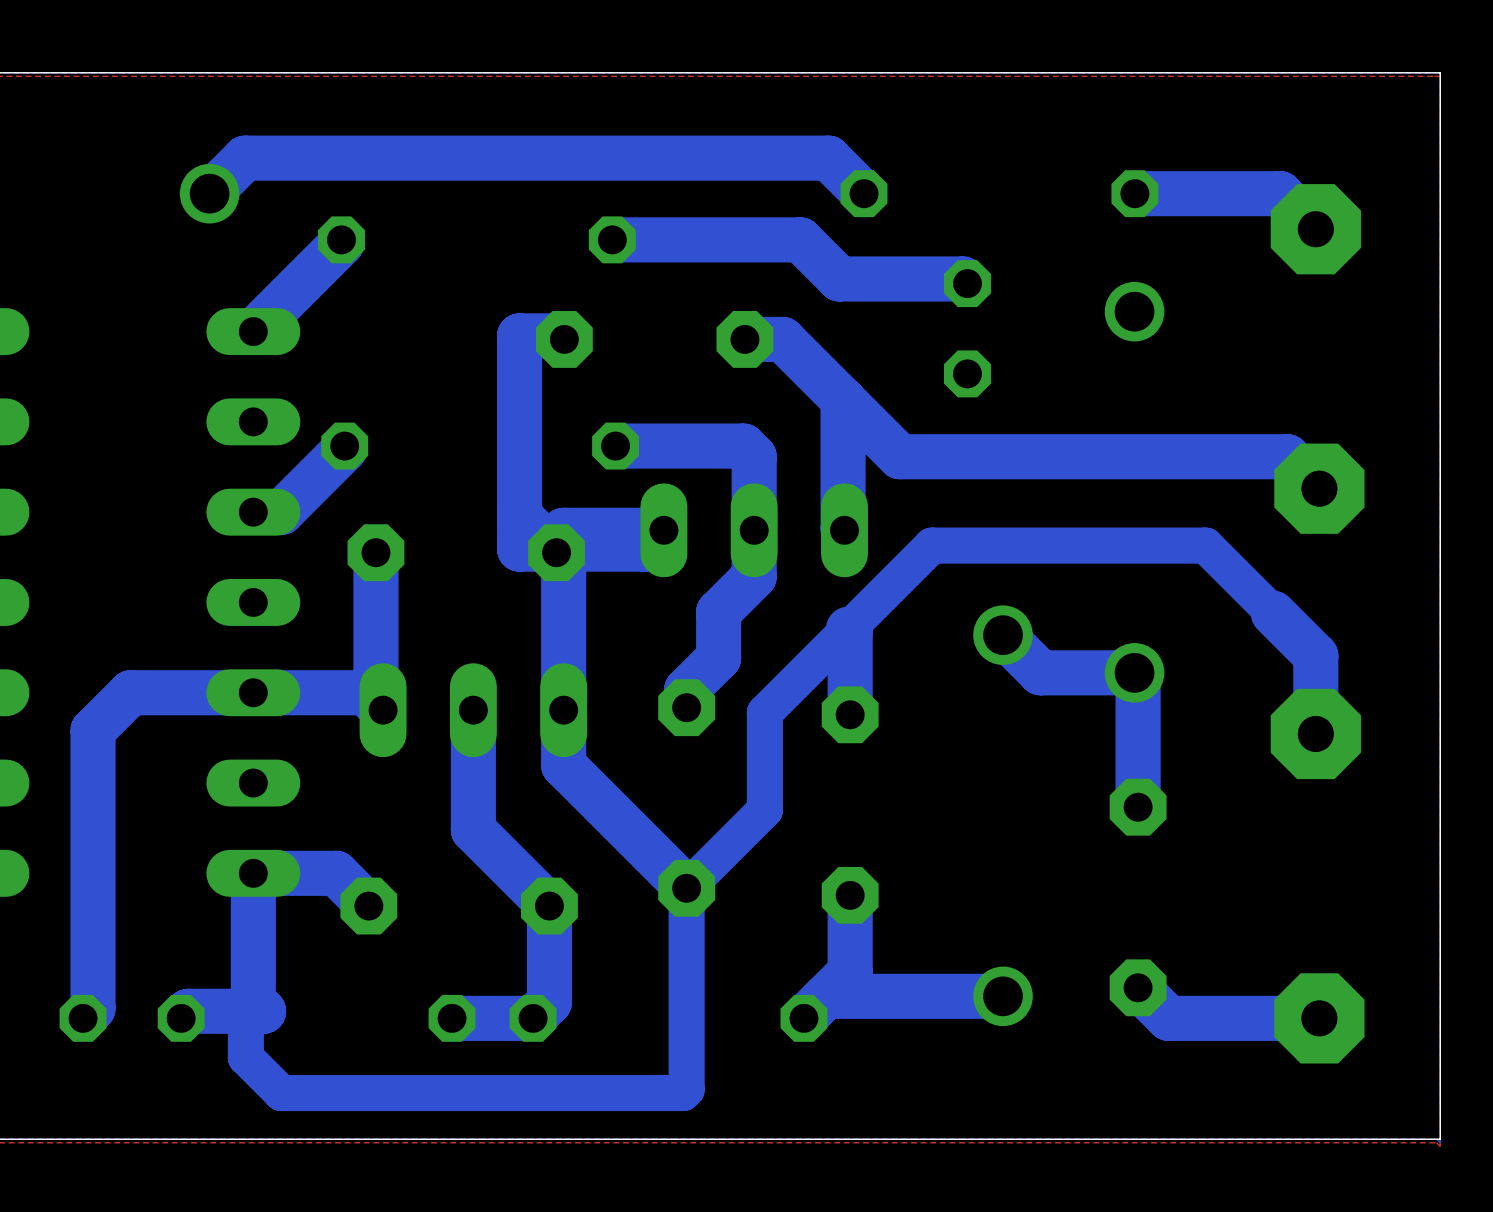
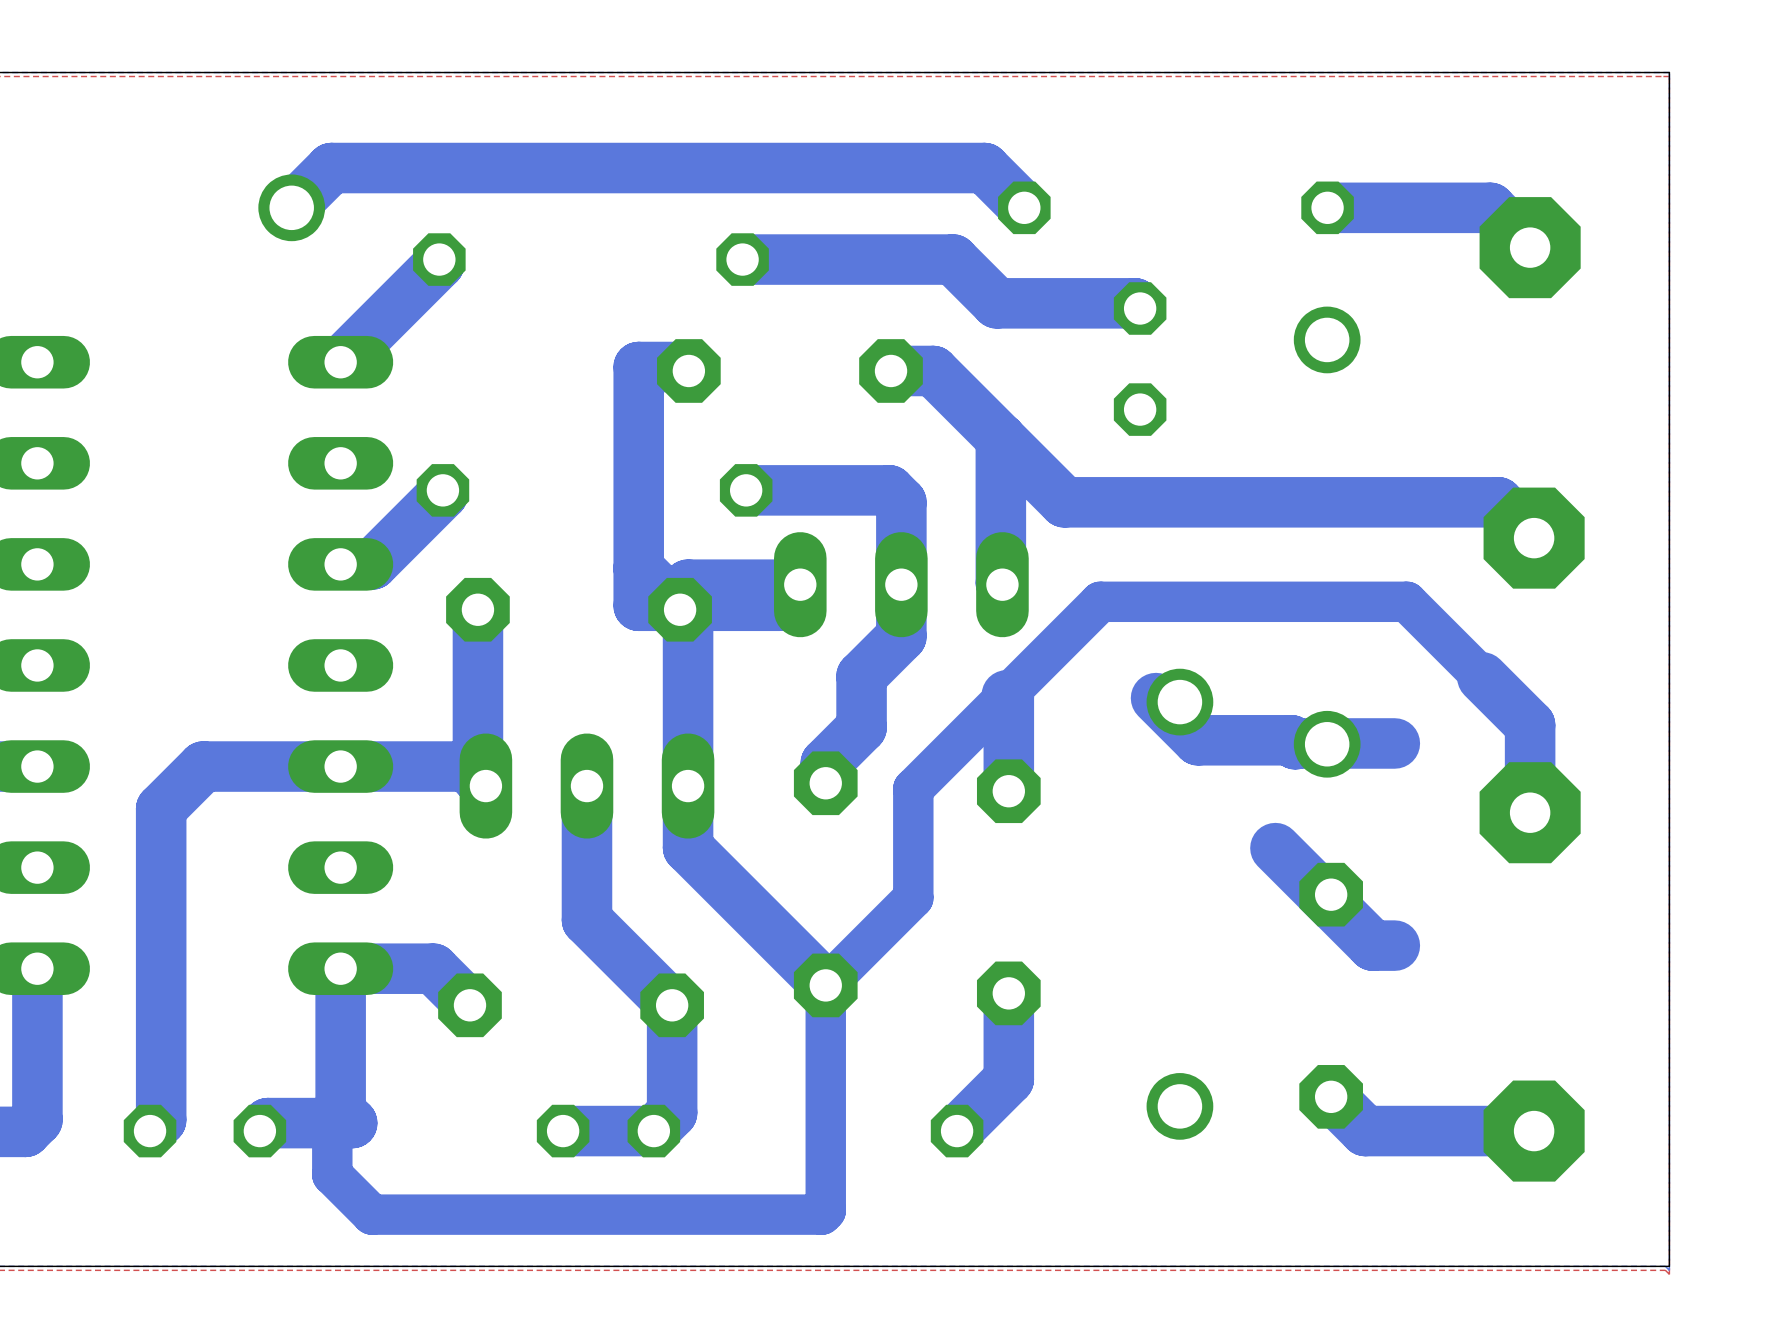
bottom track: none -> (1156, 698) (1198, 740) (1291, 740) (1295, 744) (1394, 743)
bottom track: (1003, 635) (1040, 672) (1134, 672) (1138, 676) (1138, 807) -> none
bottom track: none -> (1275, 848) (1372, 945) (1394, 945)
bottom track: (1003, 996) (826, 996) -> none

